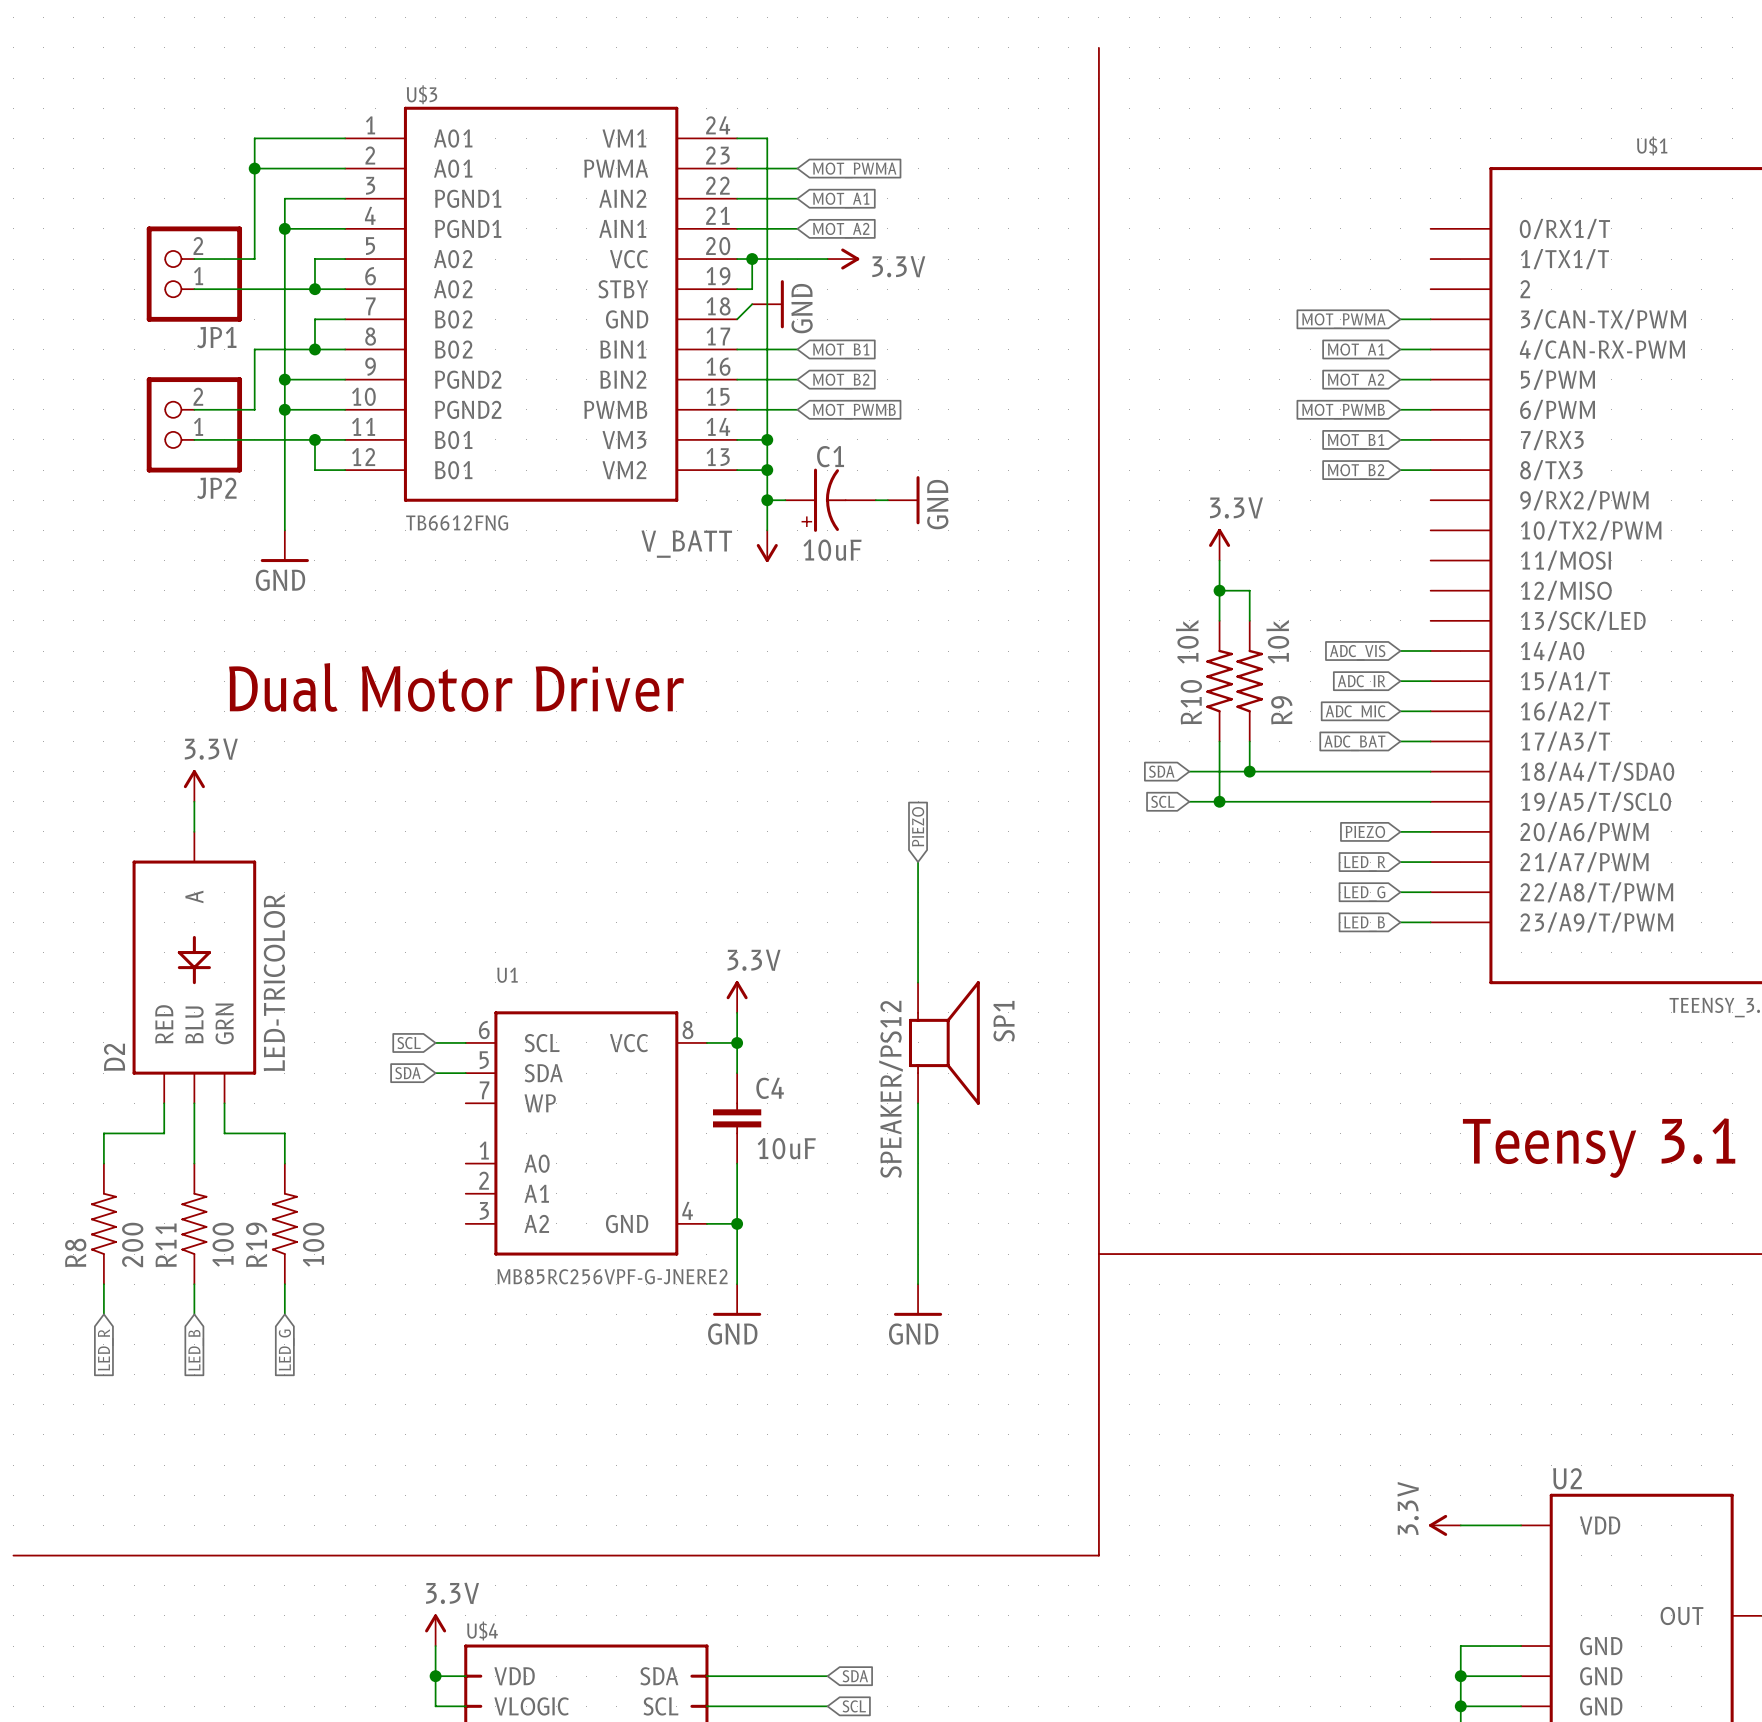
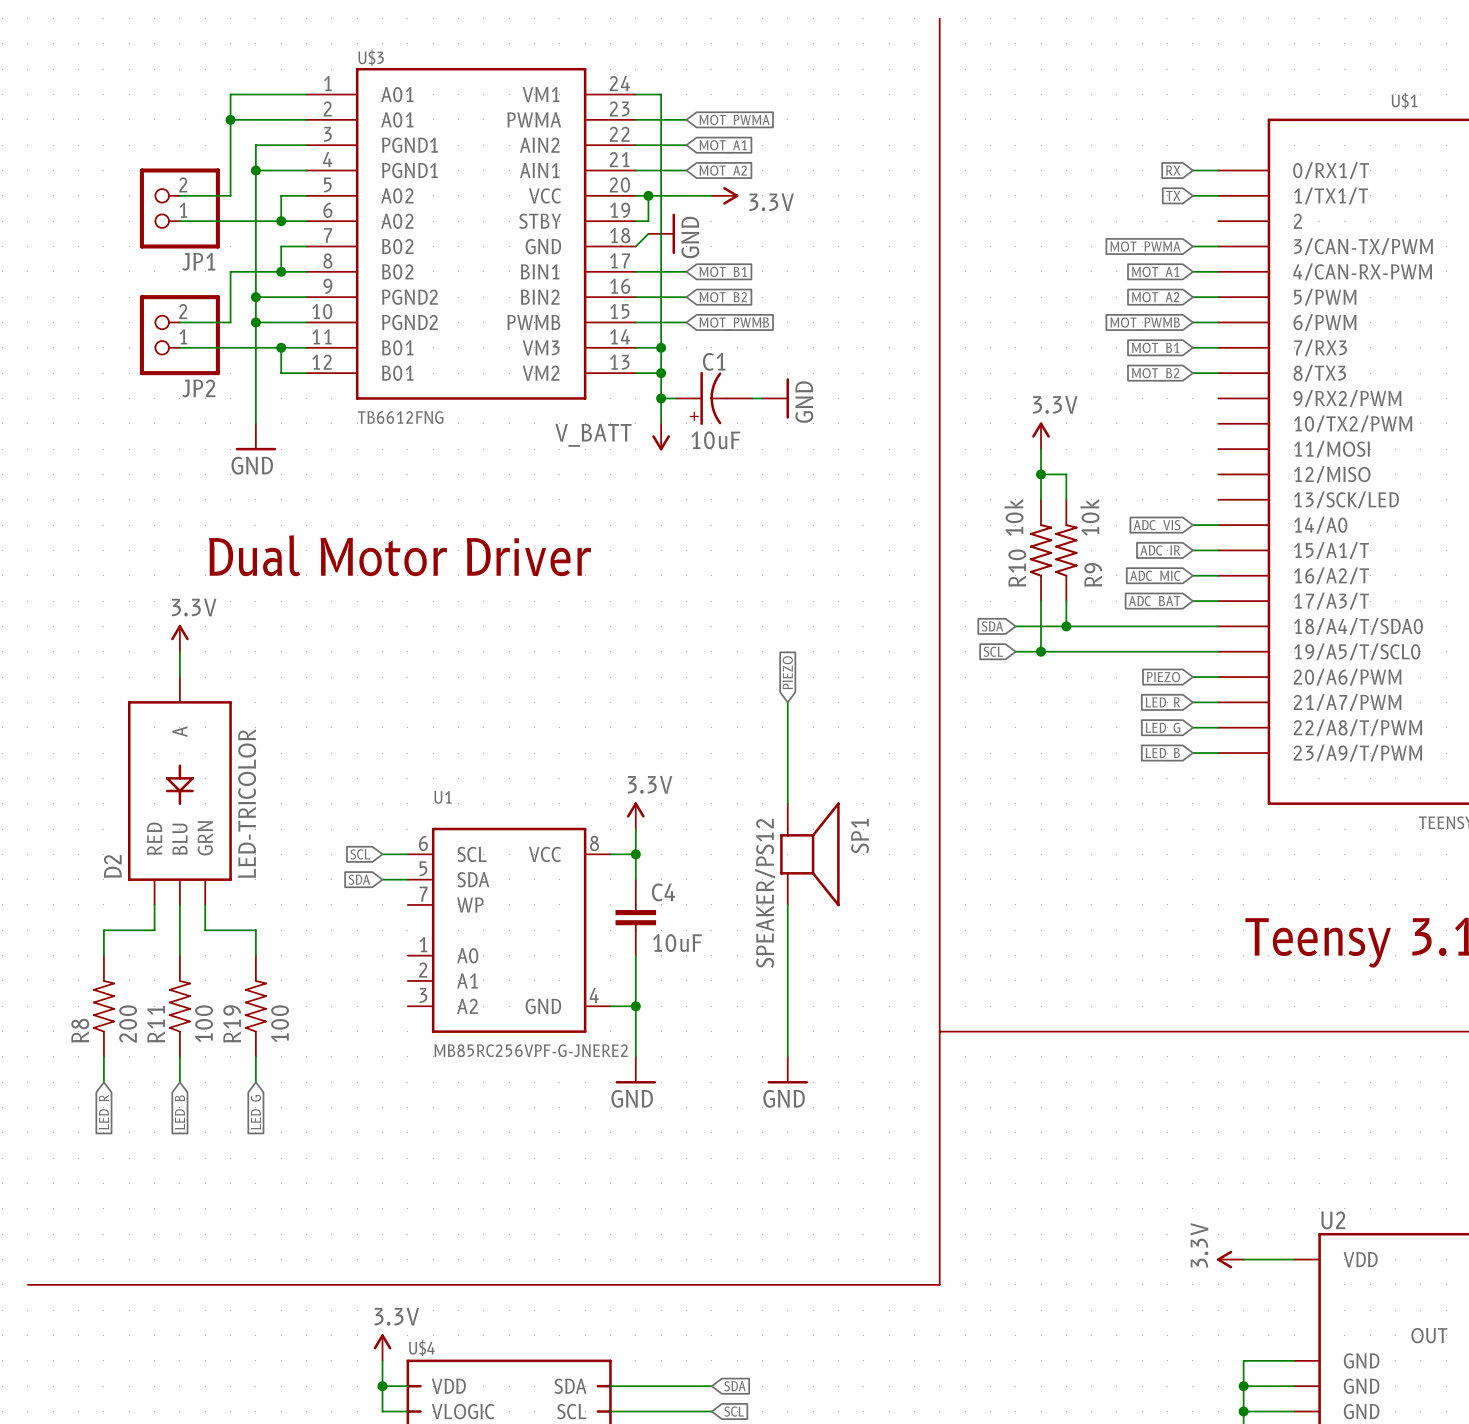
global label: none -> RX (1173, 170)
wire: none -> (1192, 170) (1218, 170)
global label: none -> TX (1173, 195)
wire: none -> (1192, 195) (1218, 195)

